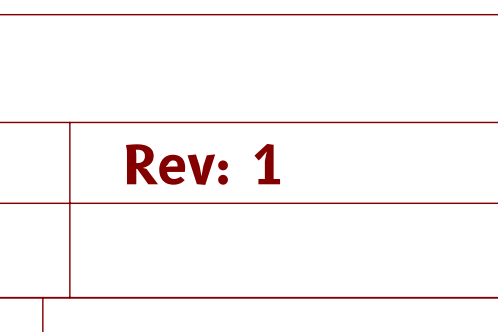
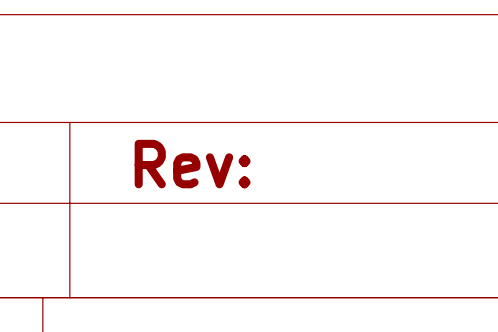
title block: Rev: 1 (203, 164) -> Rev: (192, 164)

